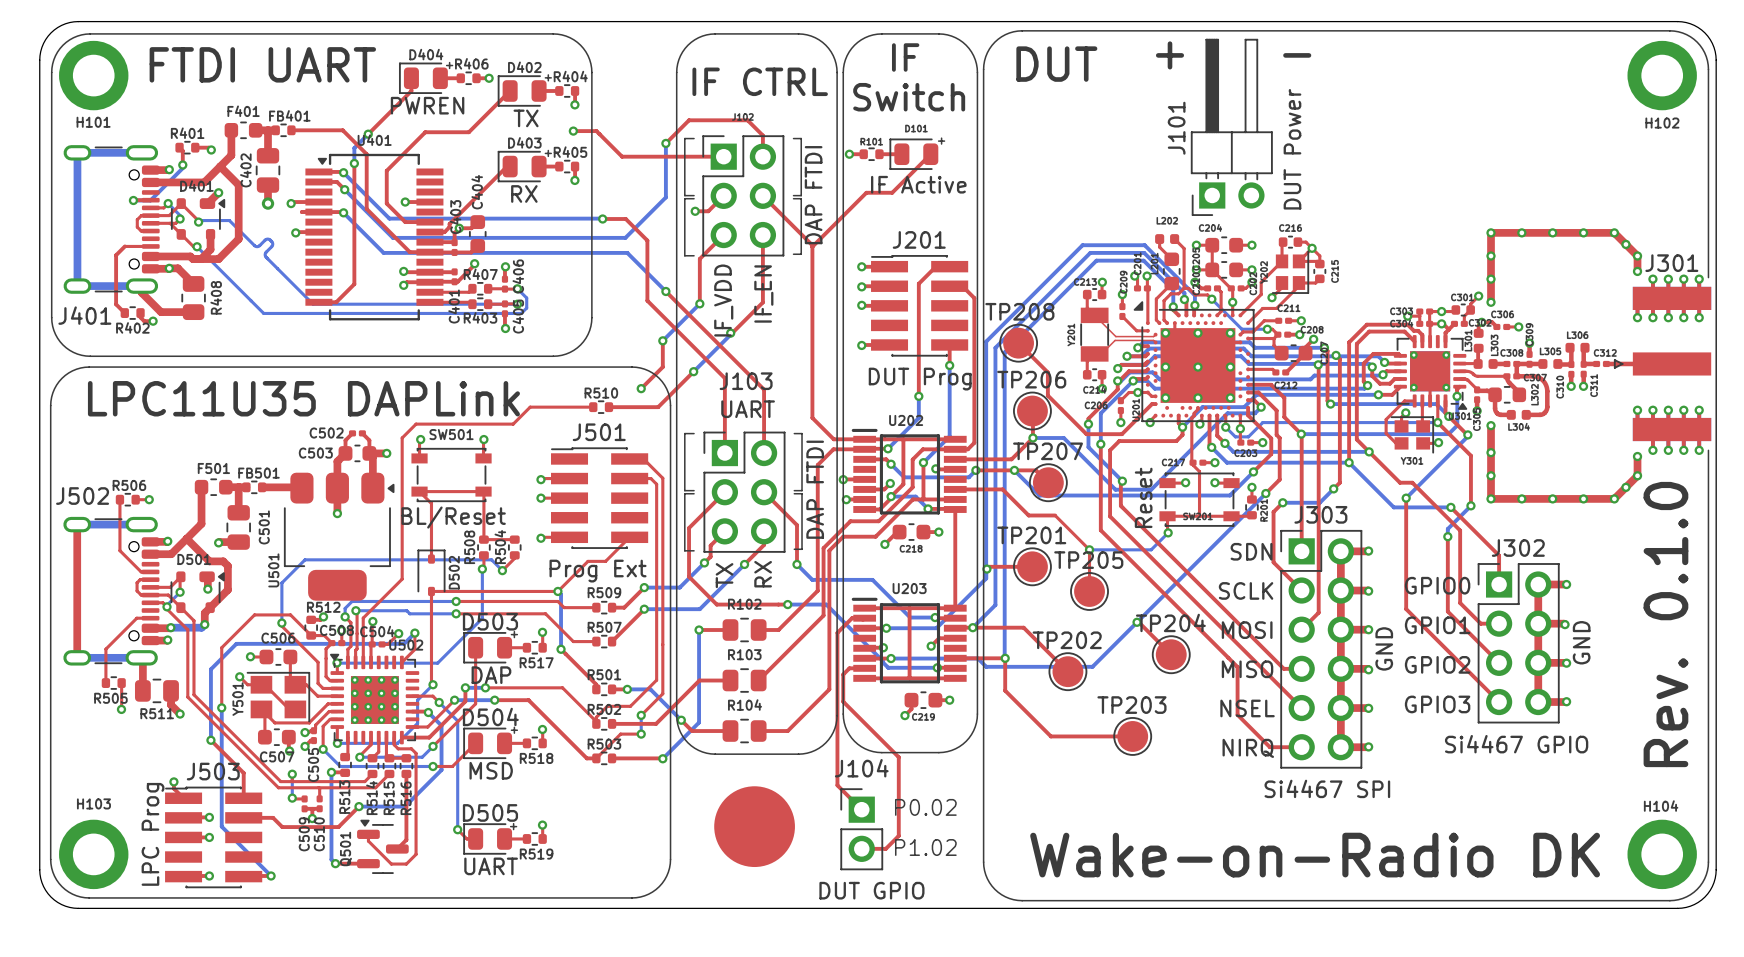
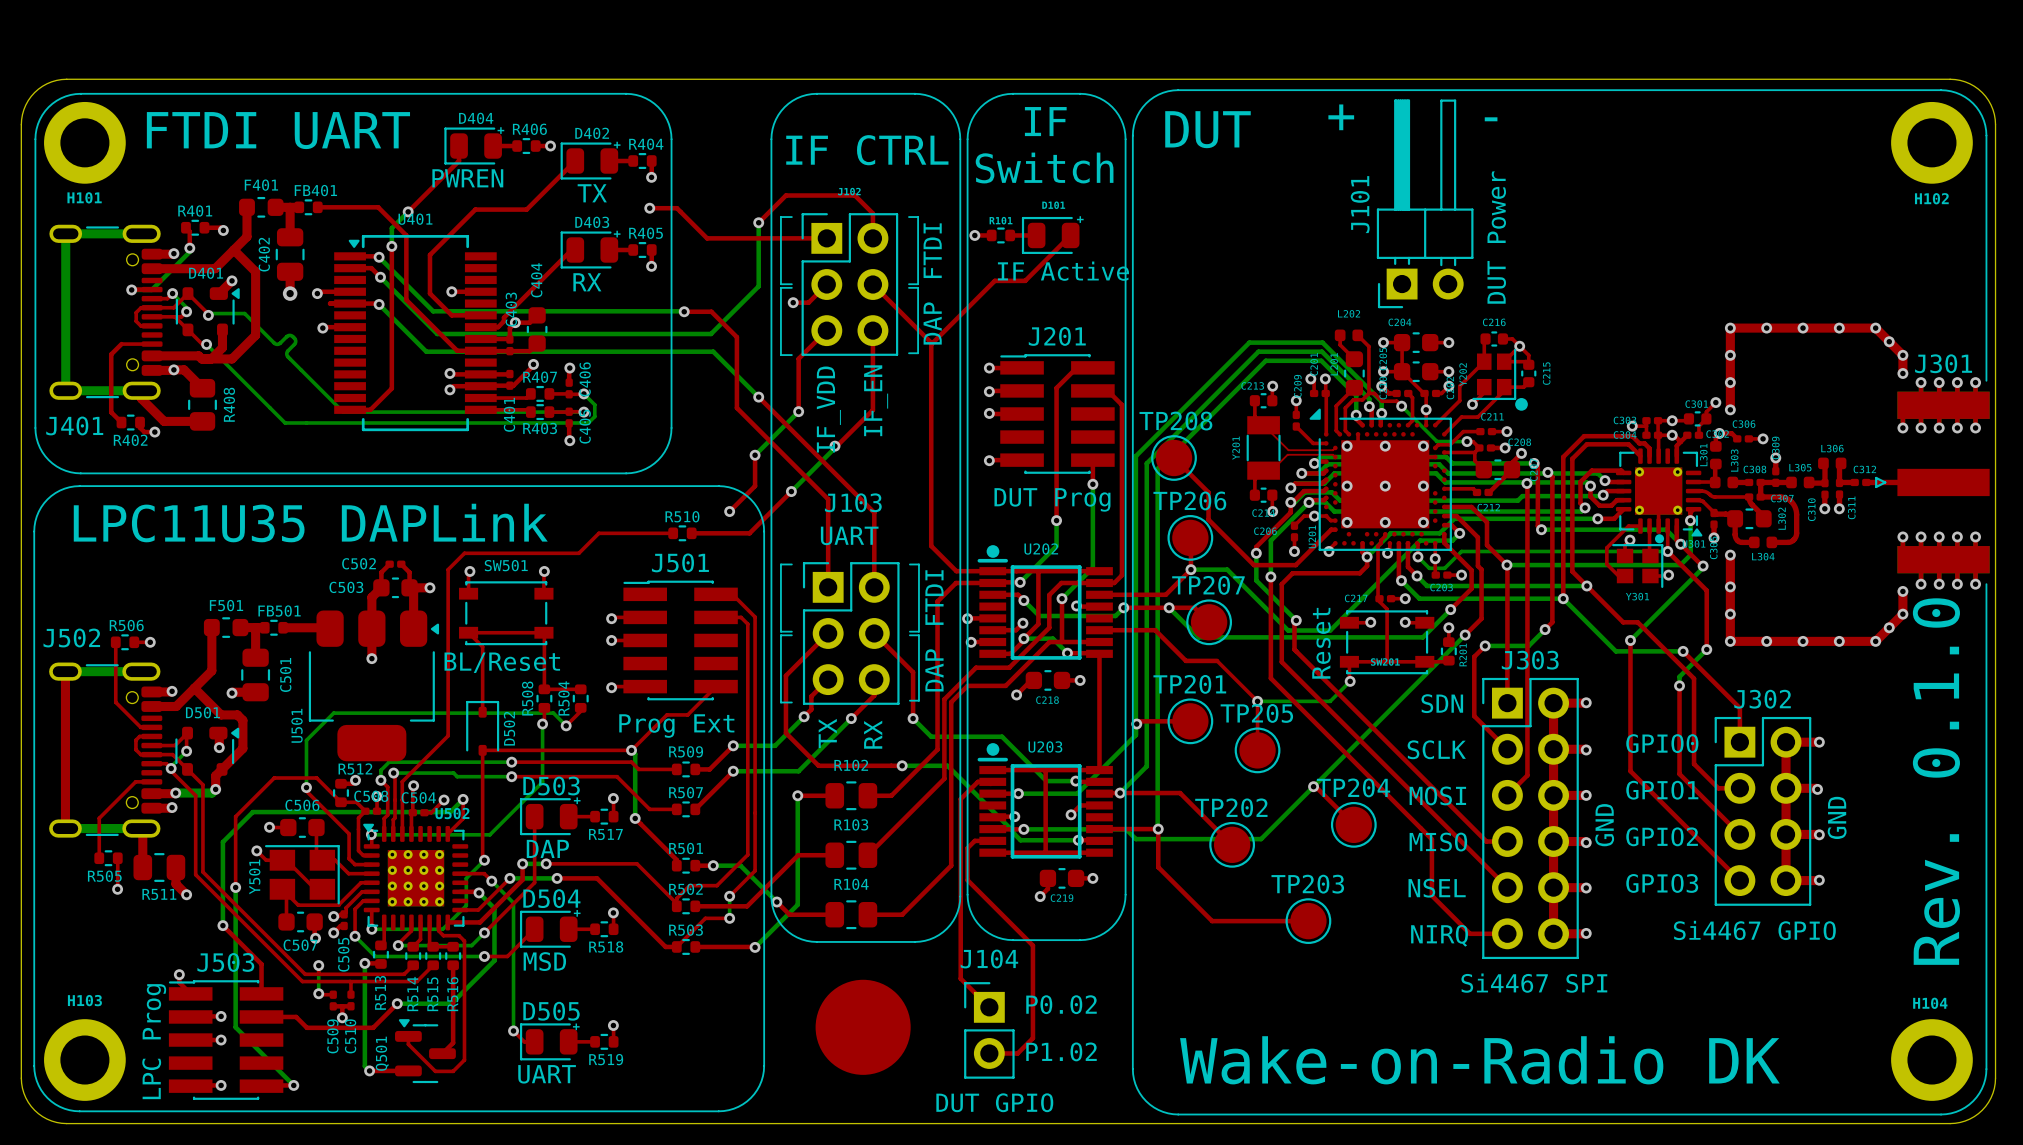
drawing: none -> [1515, 398, 1528, 411]
drawing: none -> [1654, 534, 1665, 544]
drawing: none -> [986, 545, 1000, 558]
drawing: none -> [986, 743, 1000, 756]

